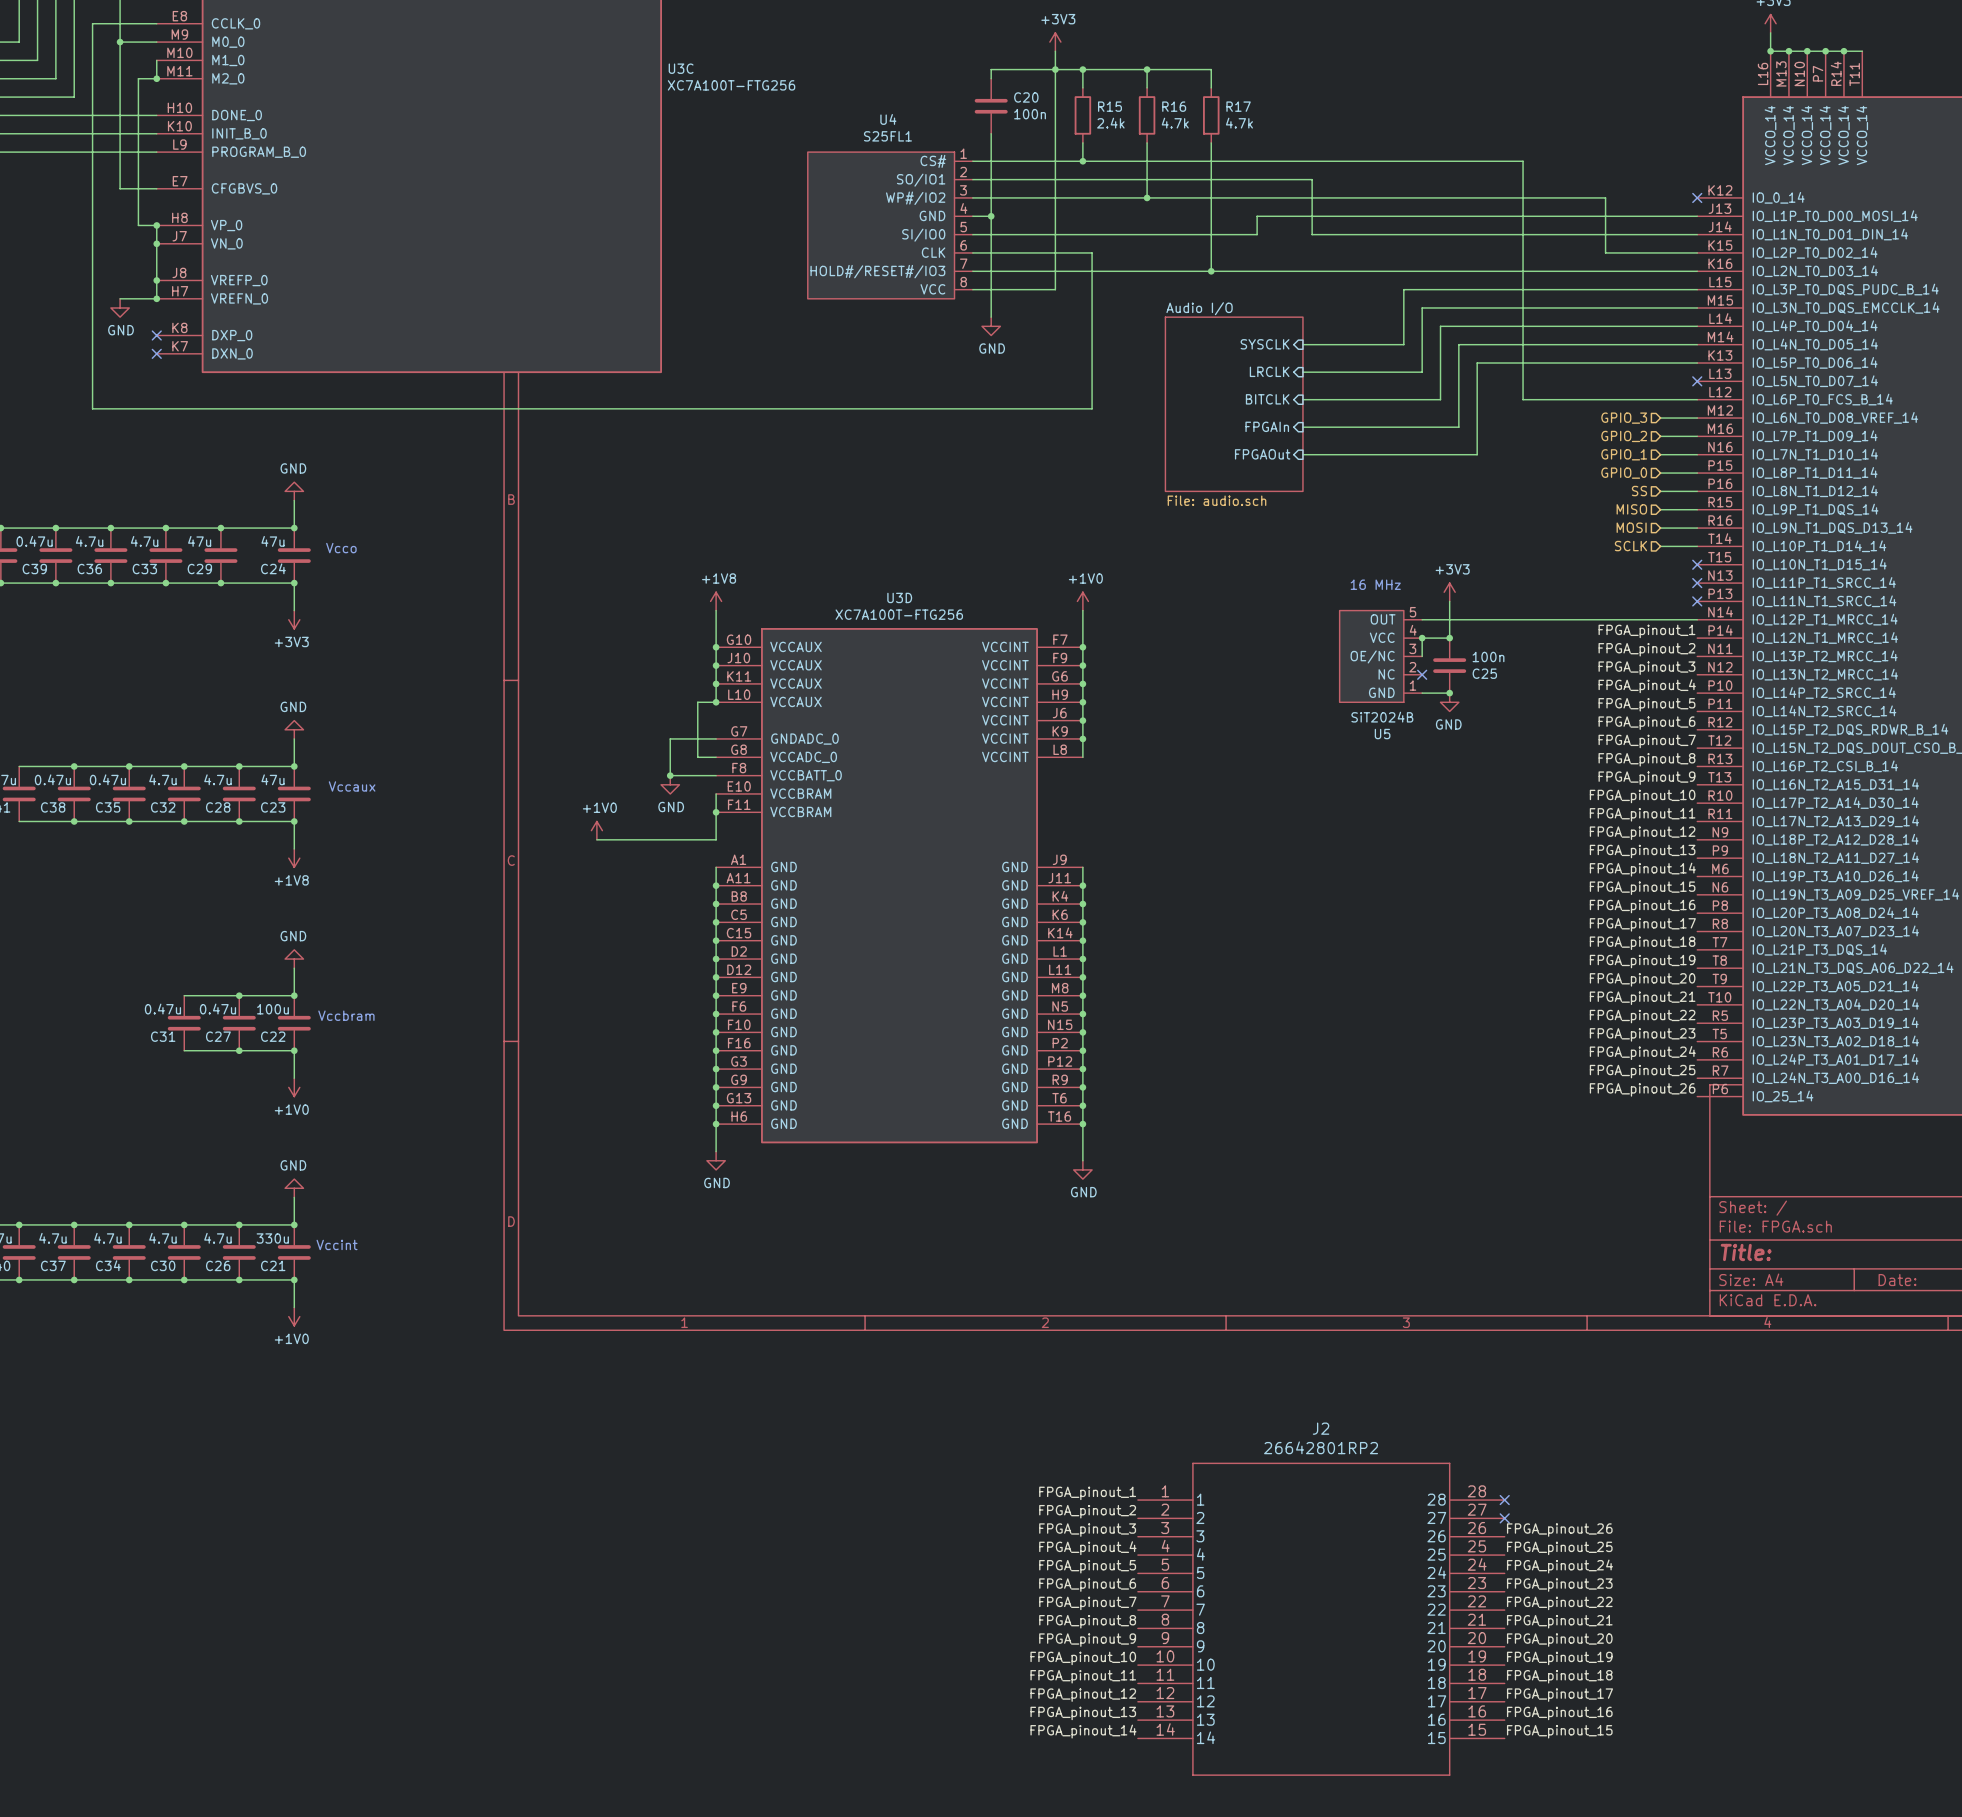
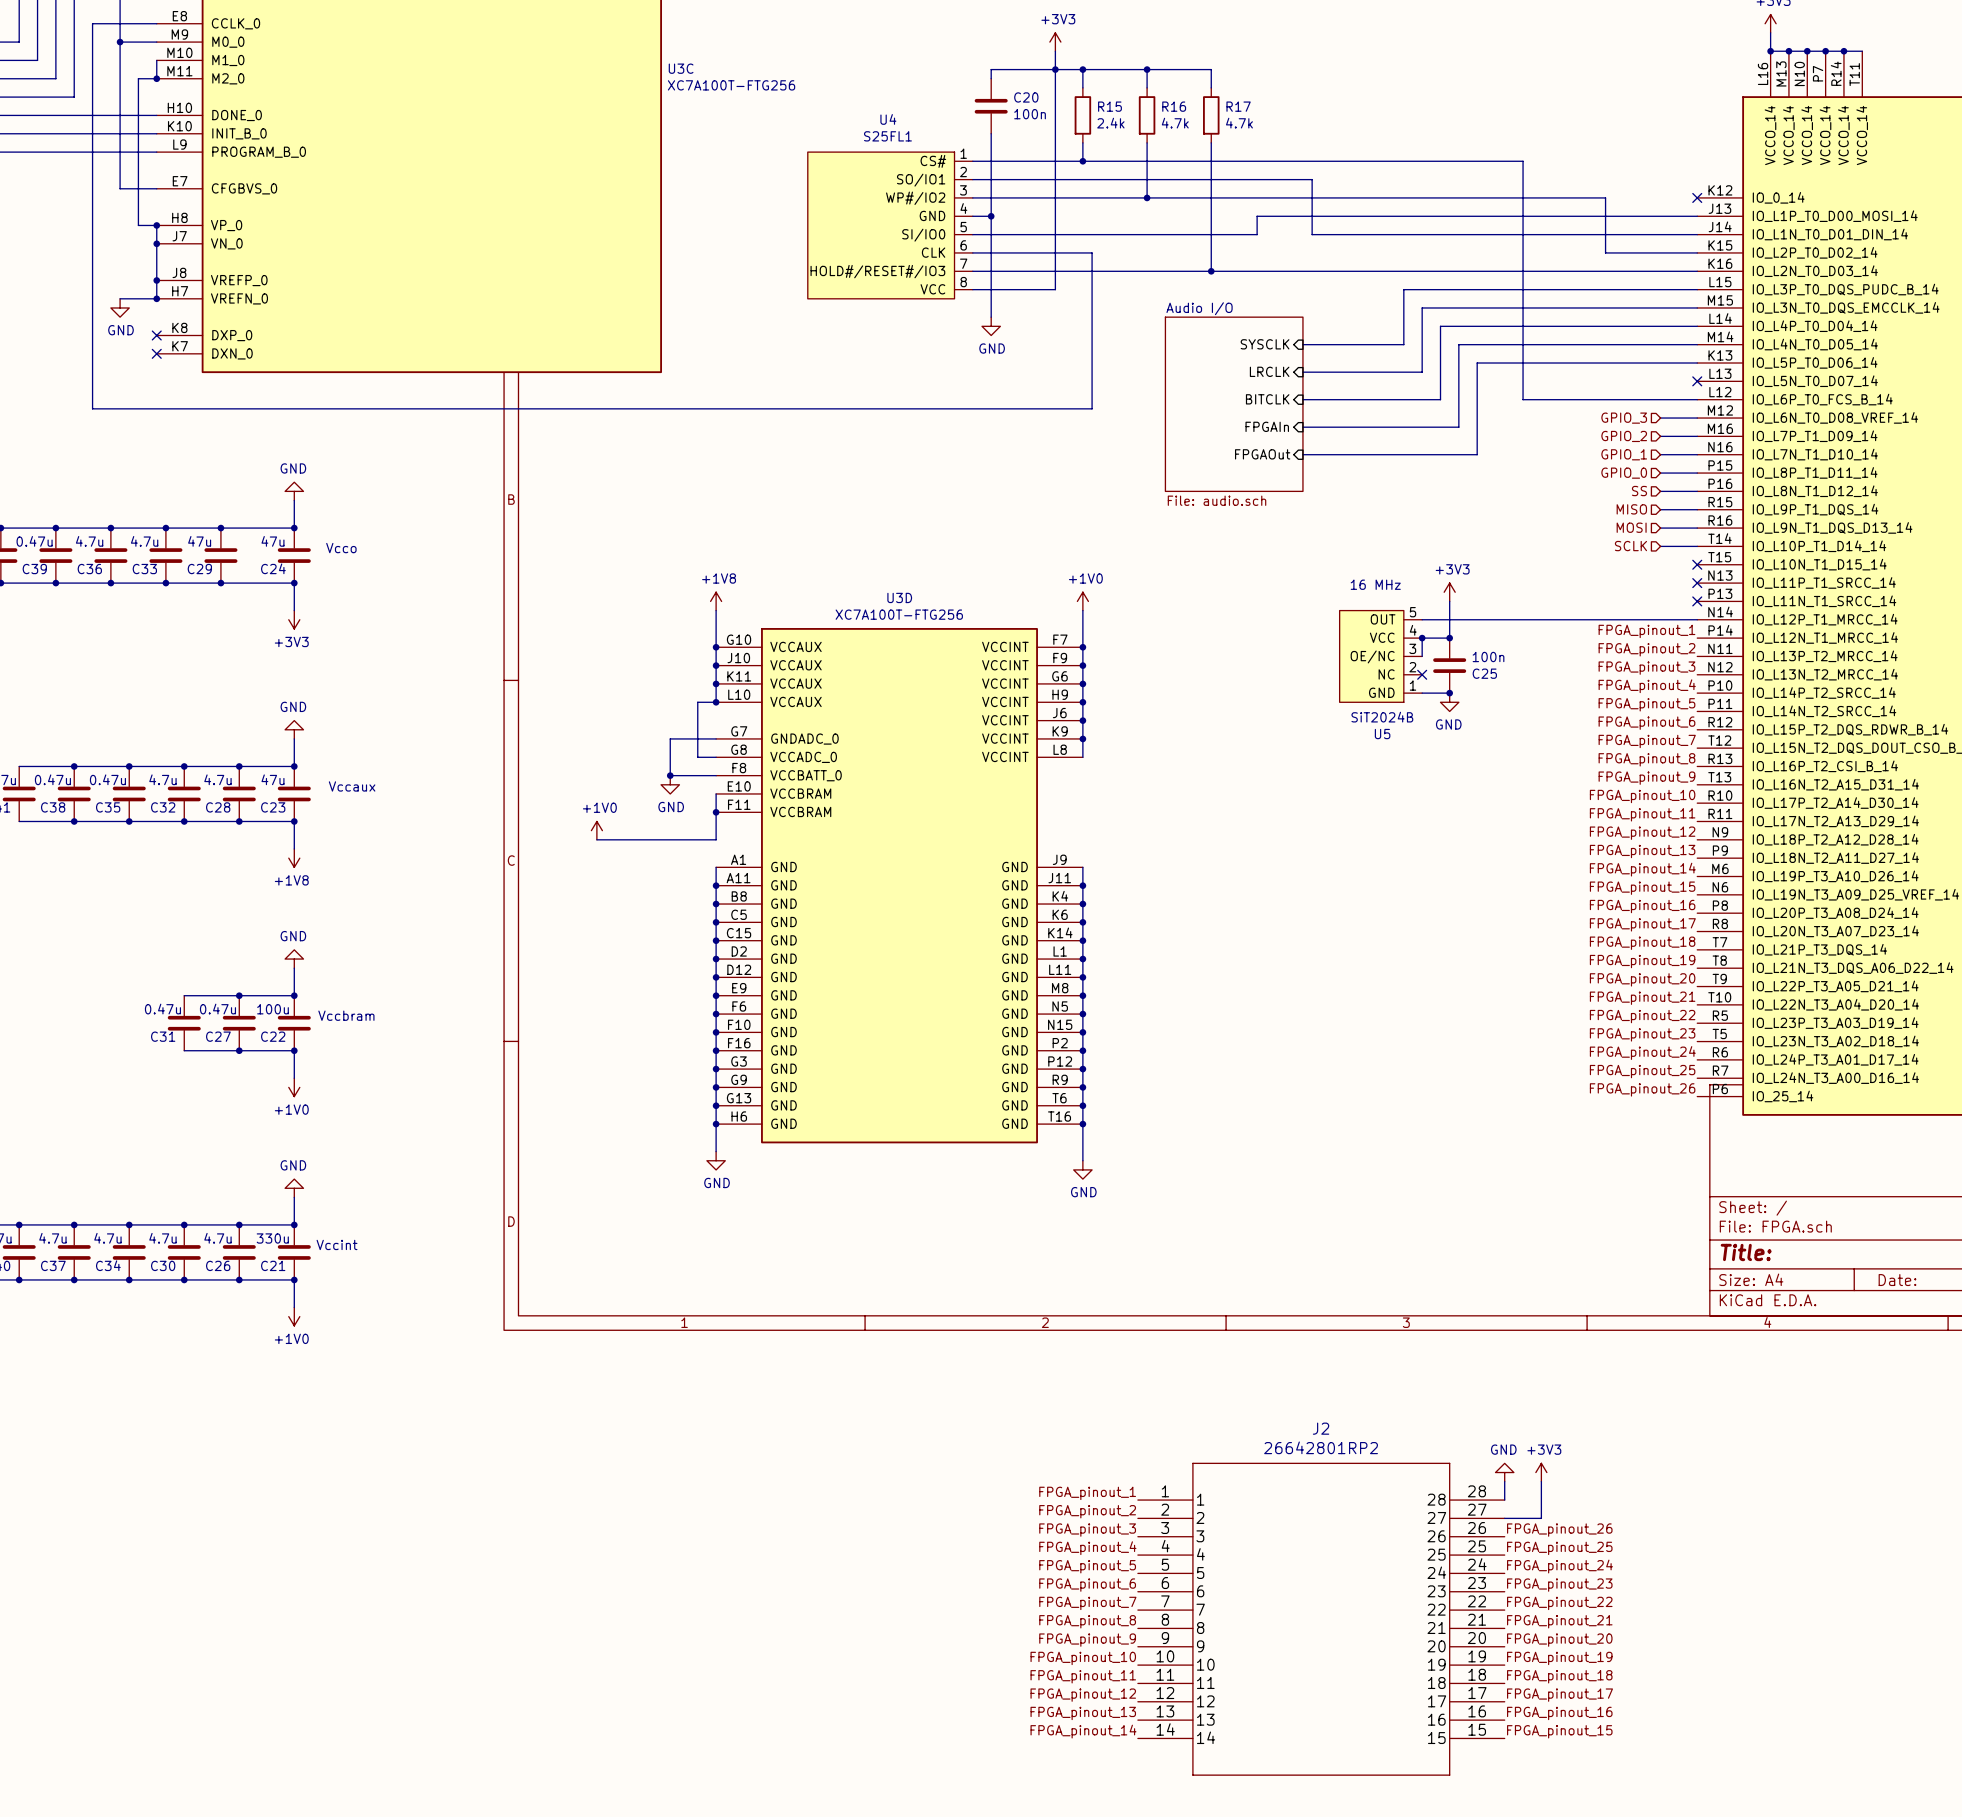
power symbol: none -> GND (1504, 1472)
power symbol: none -> +3V3 (1541, 1472)
wire: none -> (1504, 1481) (1504, 1500)
wire: none -> (1541, 1481) (1541, 1518) (1504, 1518)
no-connect mark: (1504, 1500) -> none
no-connect mark: (1504, 1518) -> none

